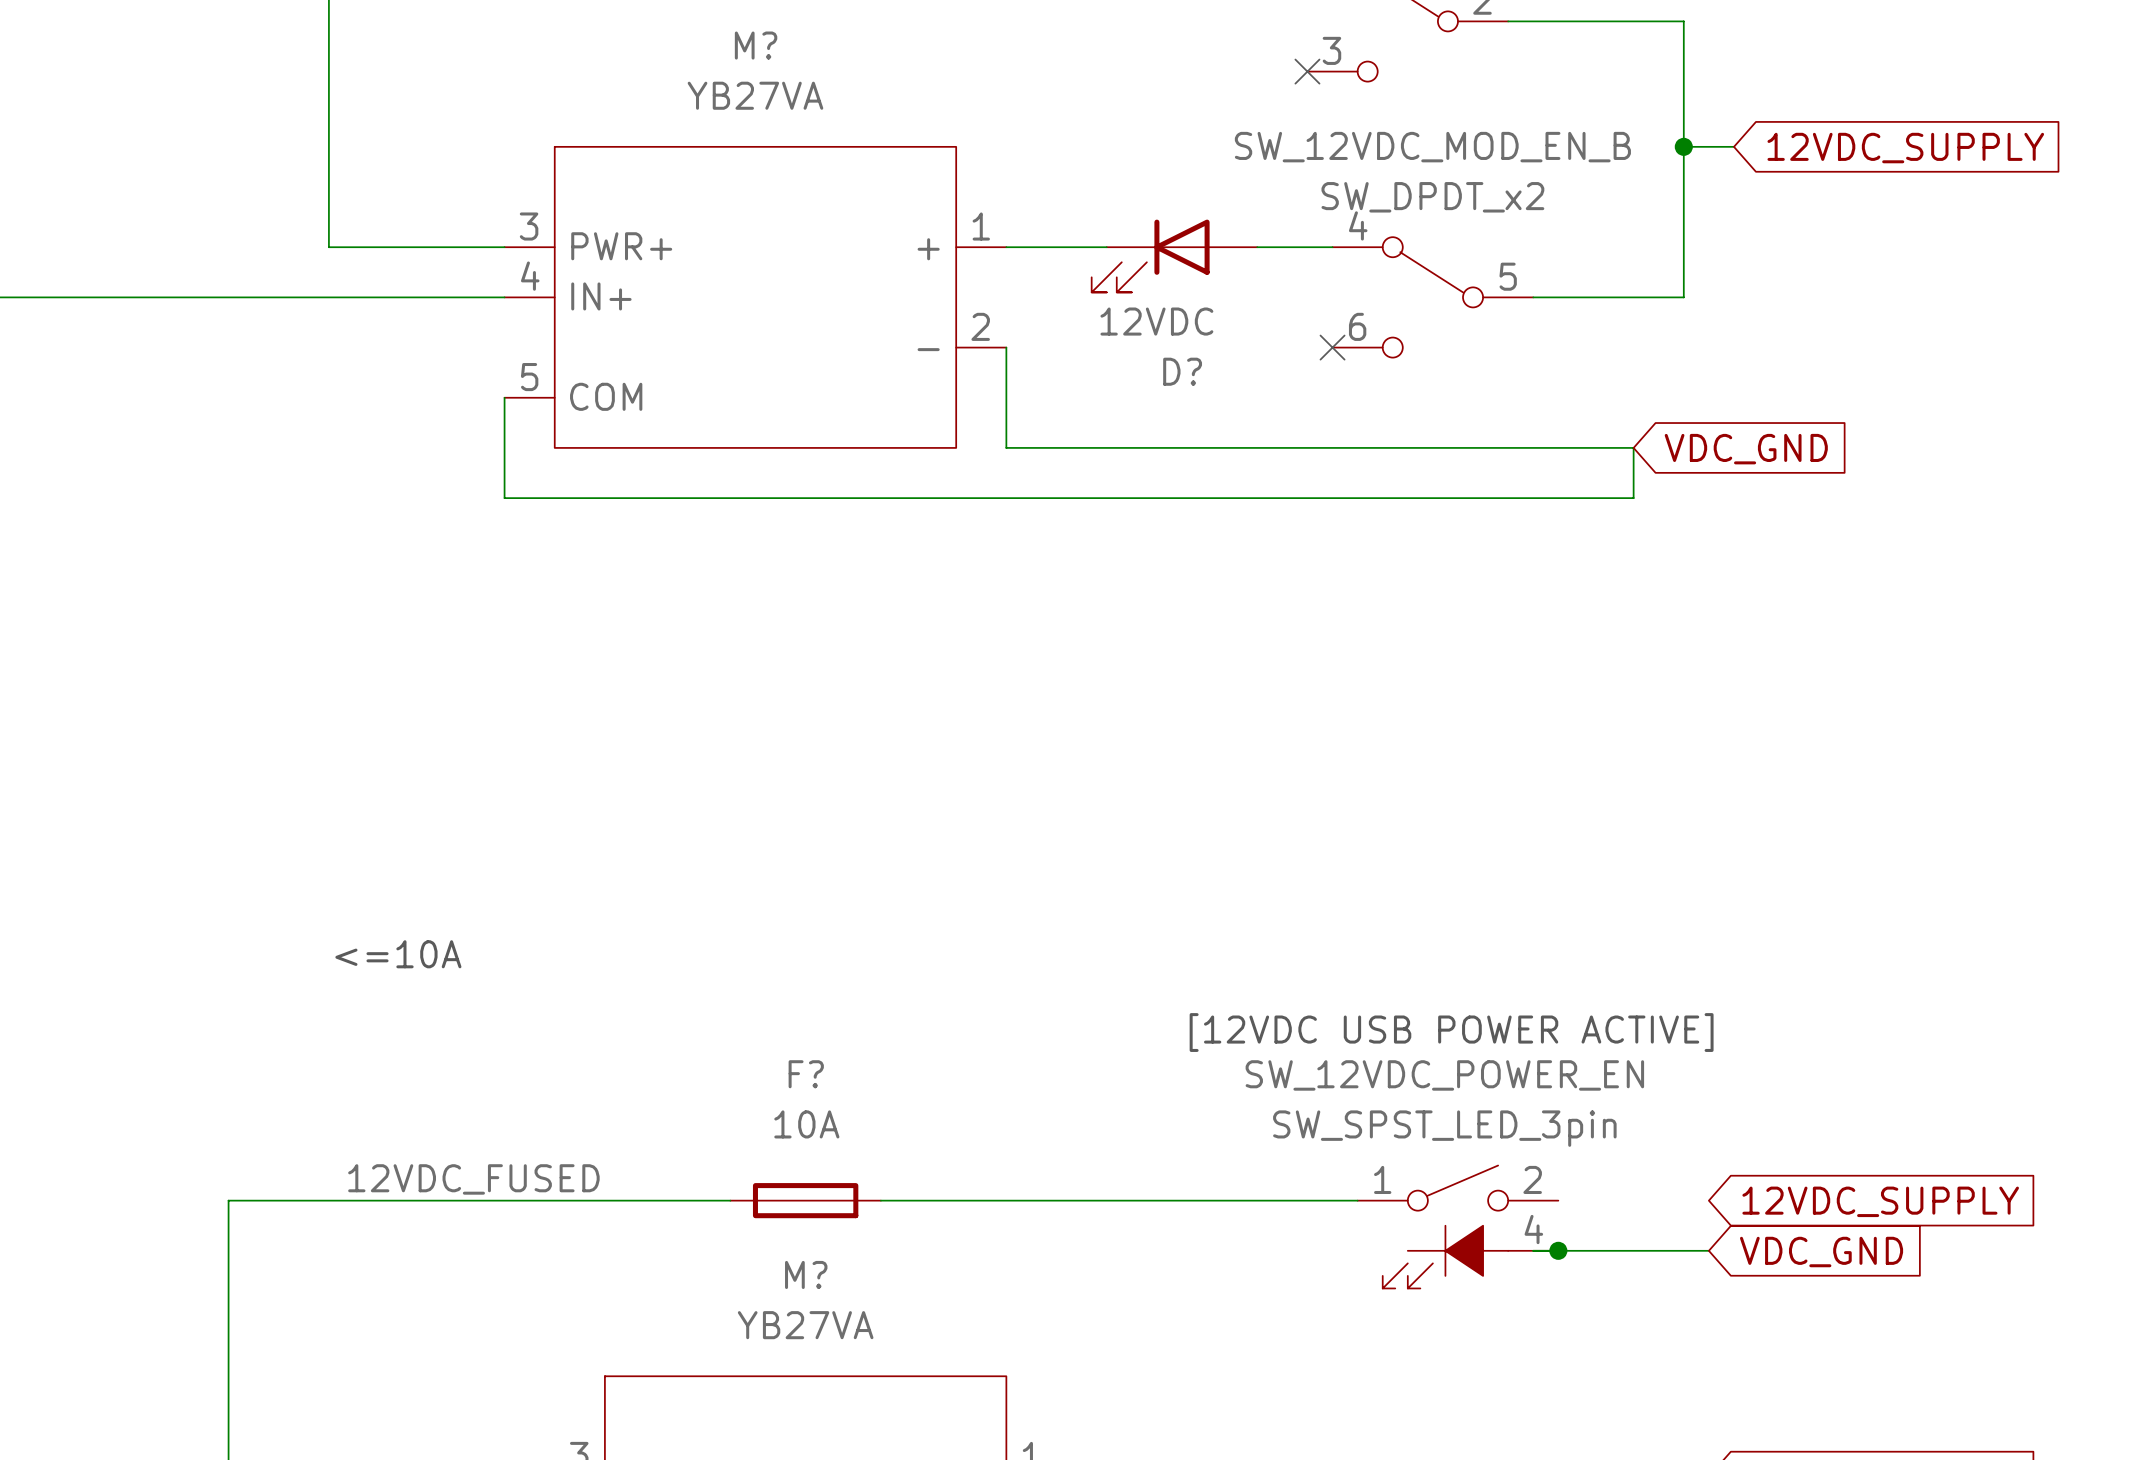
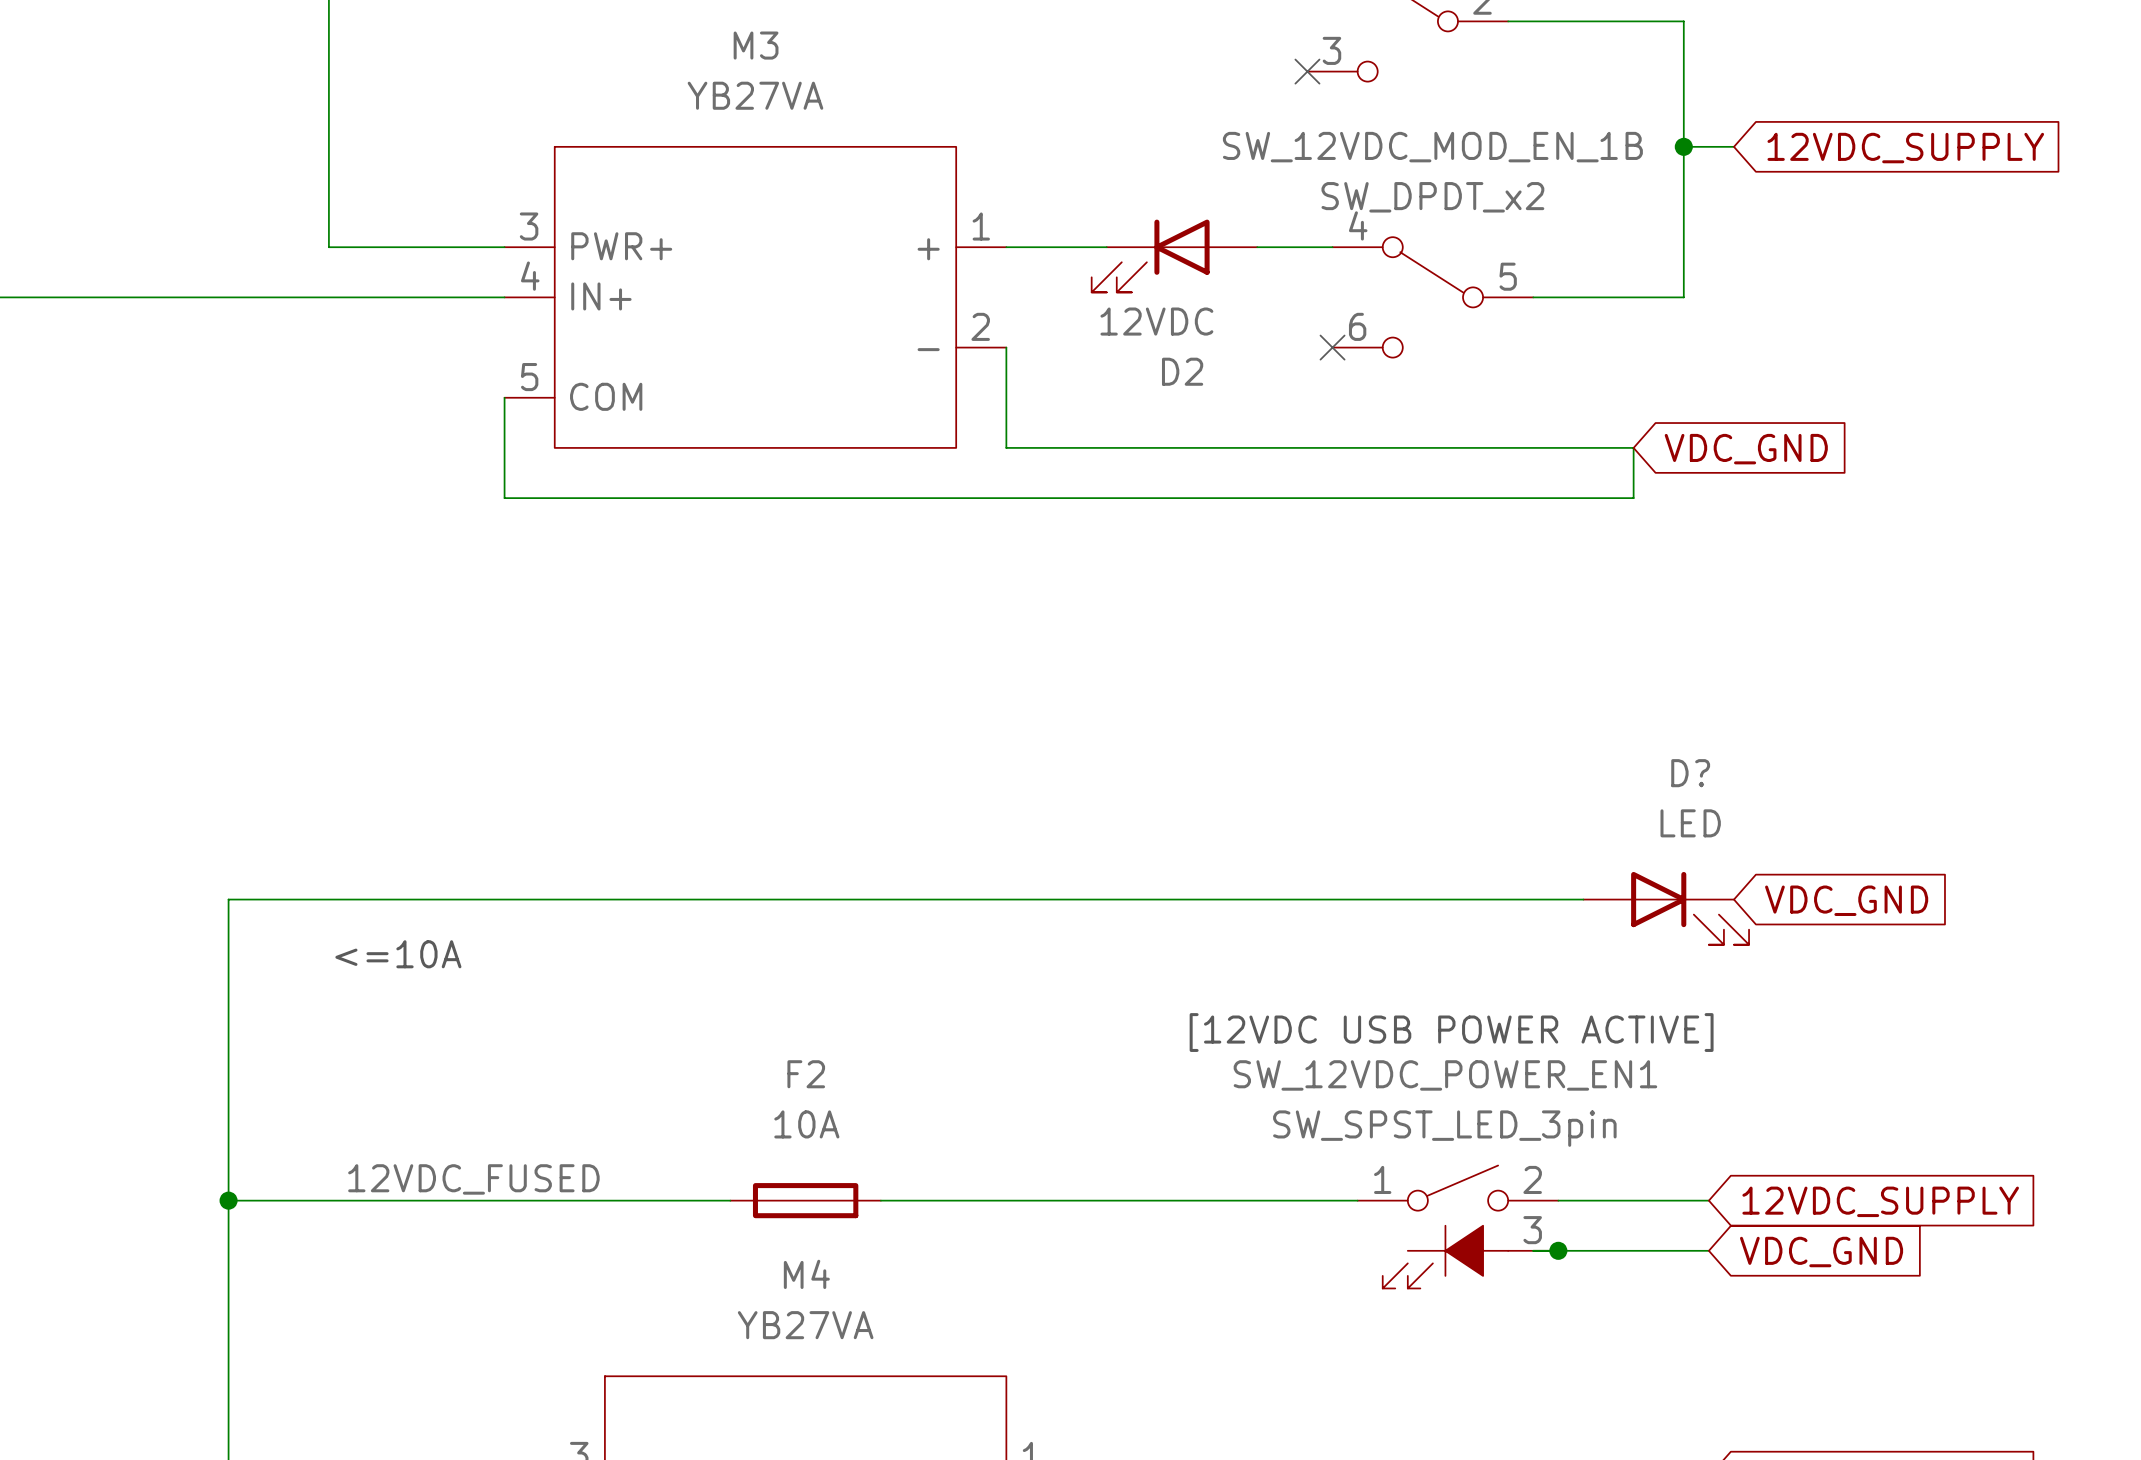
M? name: M? (756, 45) -> M3 (756, 45)
SW_12VDC_MOD_EN_B name: SW_12VDC_MOD_EN_B (1432, 147) -> SW_12VDC_MOD_EN_1B (1432, 147)
D? name: D? (1182, 371) -> D2 (1182, 371)
wire: none -> (1583, 899) (228, 899) (228, 1200)
global label: none -> VDC_GND (1846, 900)
D?: none -> LED (1666, 908)
F? name: F? (806, 1074) -> F2 (806, 1074)
SW_12VDC_POWER_EN name: SW_12VDC_POWER_EN (1444, 1075) -> SW_12VDC_POWER_EN1 (1445, 1075)
junction: none -> (228, 1200)
wire: none -> (1558, 1200) (1708, 1200)
SW_12VDC_POWER_EN pin number: 4 (1533, 1229) -> 3 (1532, 1230)
M? name: M? (806, 1274) -> M4 (806, 1274)

